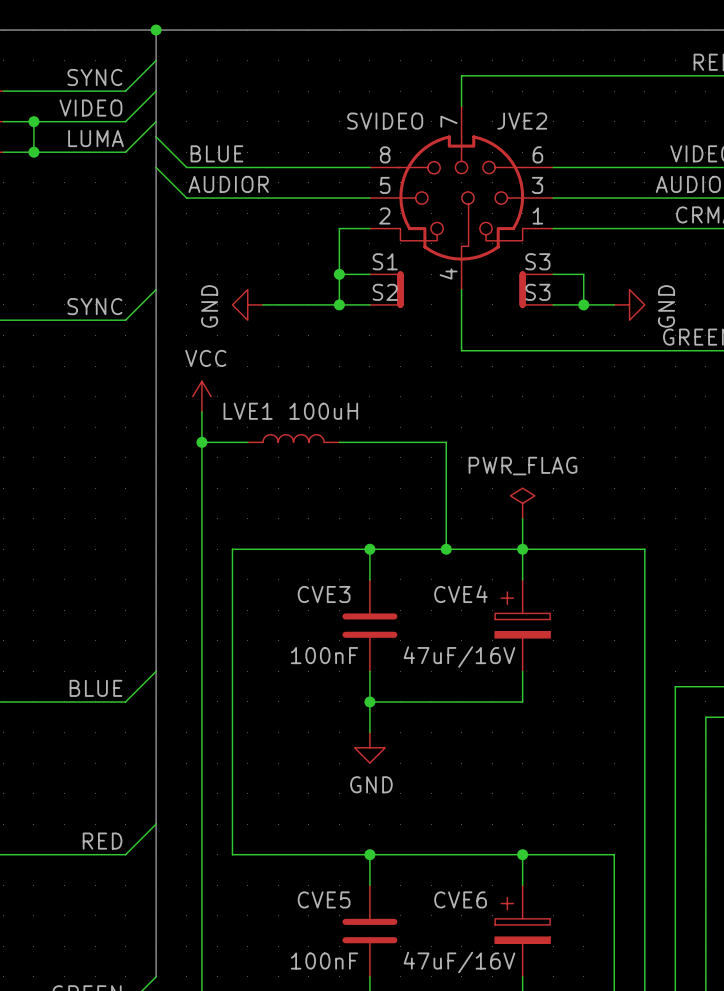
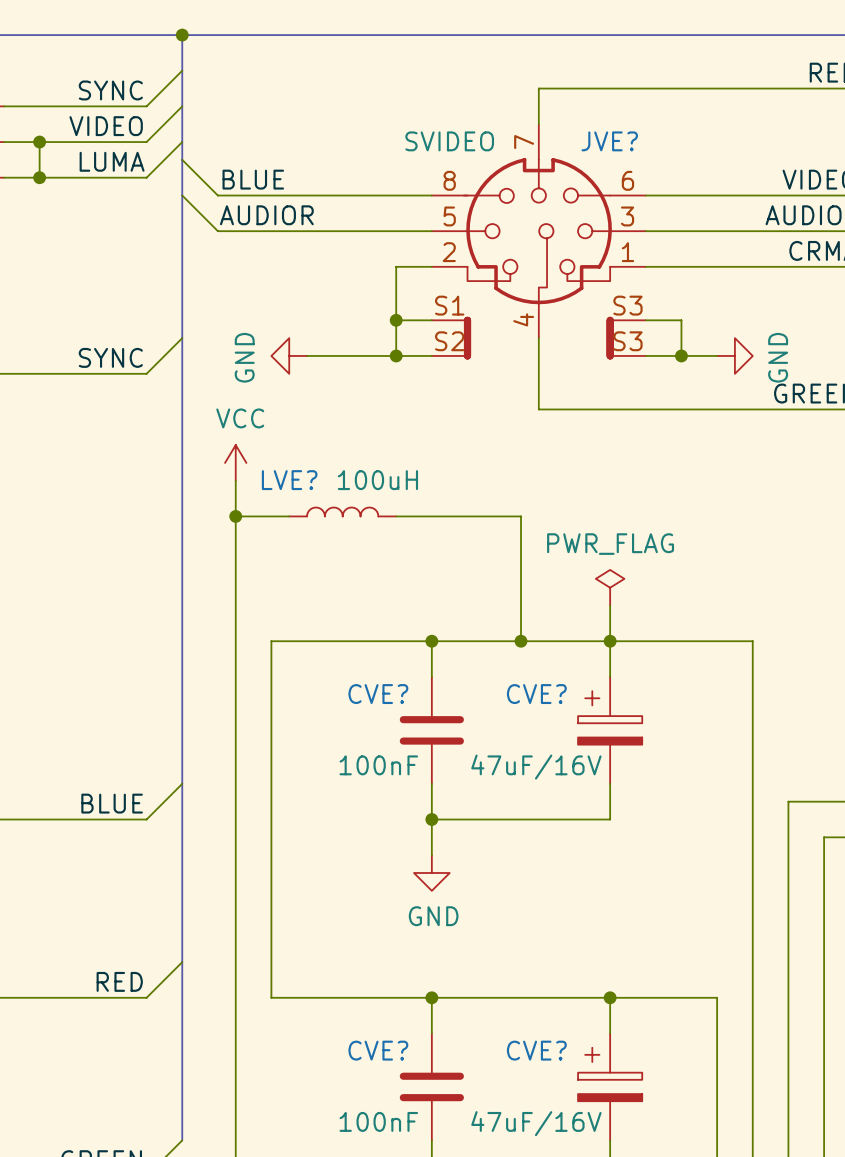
JVE2 name: JVE2 (522, 121) -> JVE? (609, 141)
LVE1 name: LVE1 (248, 411) -> LVE? (289, 480)
CVE3 name: CVE3 (324, 594) -> CVE? (378, 694)
CVE4 name: CVE4 (460, 594) -> CVE? (536, 694)
CVE5 name: CVE5 (324, 899) -> CVE? (378, 1050)
CVE6 name: CVE6 (460, 899) -> CVE? (536, 1050)

